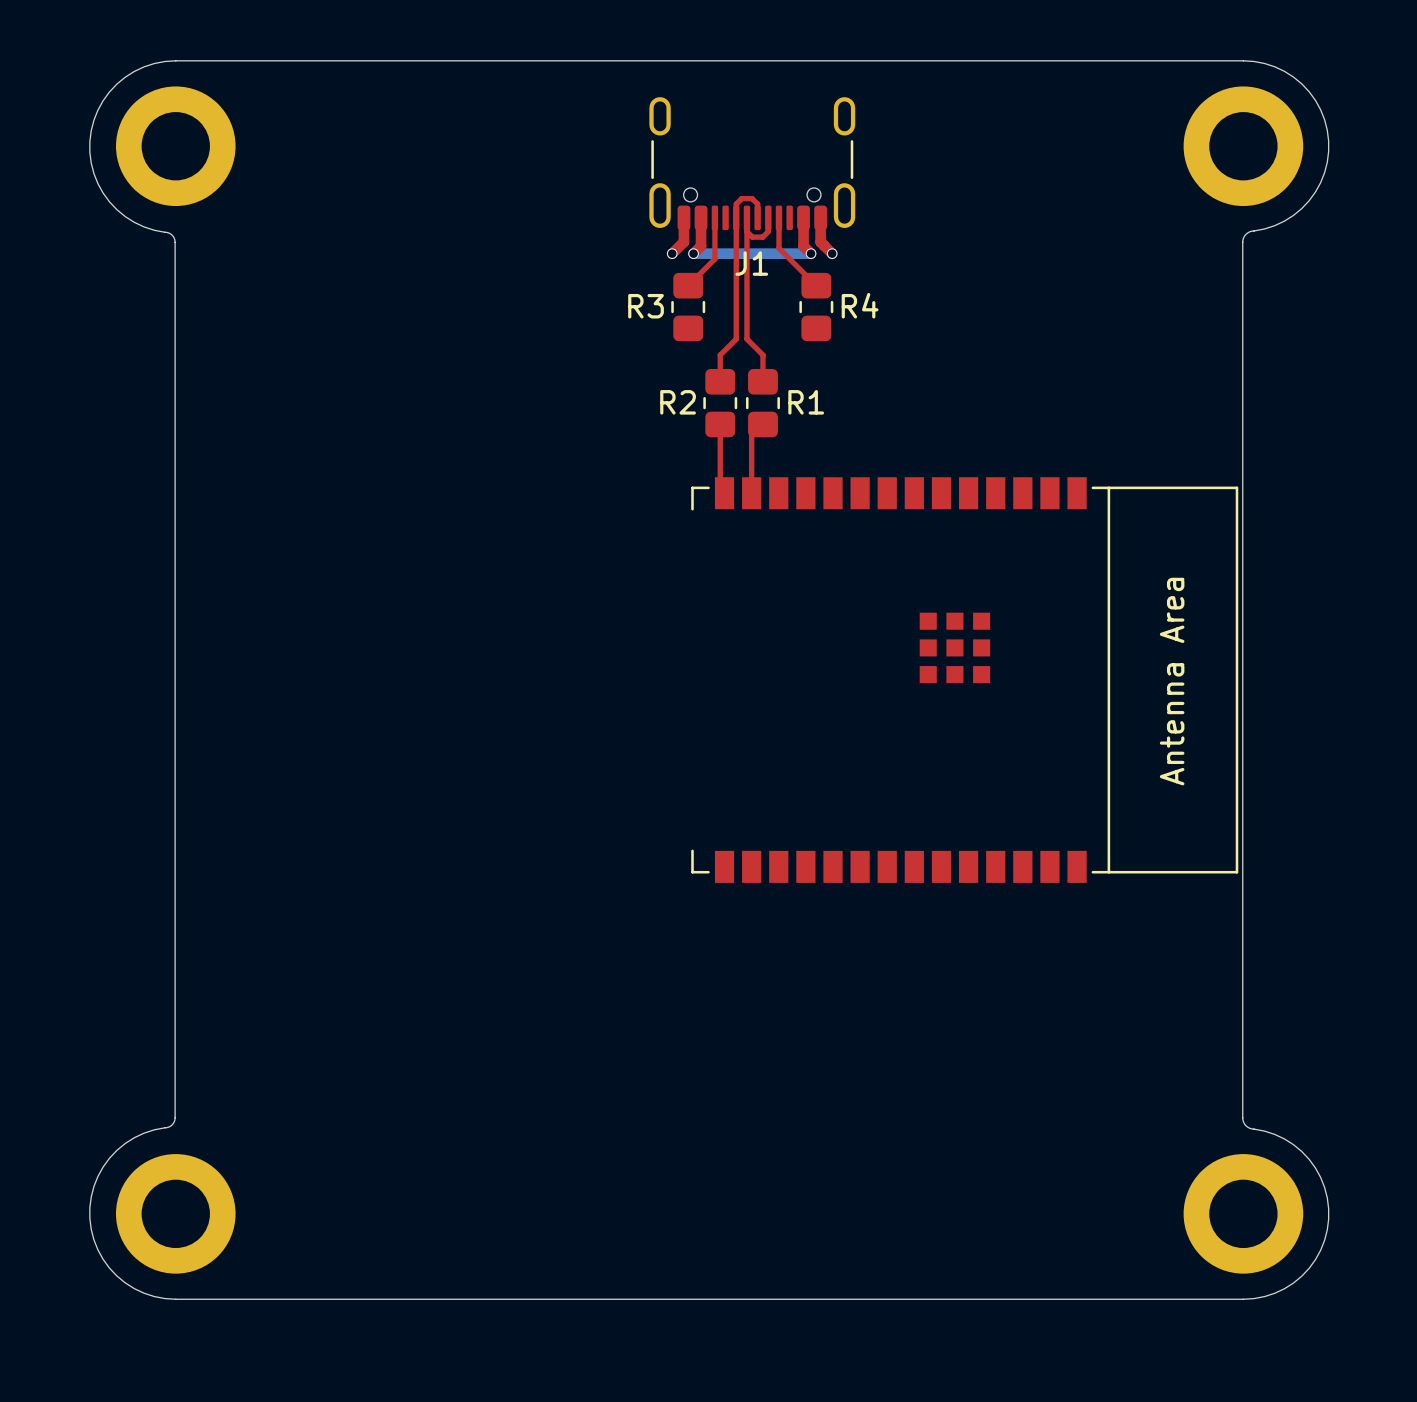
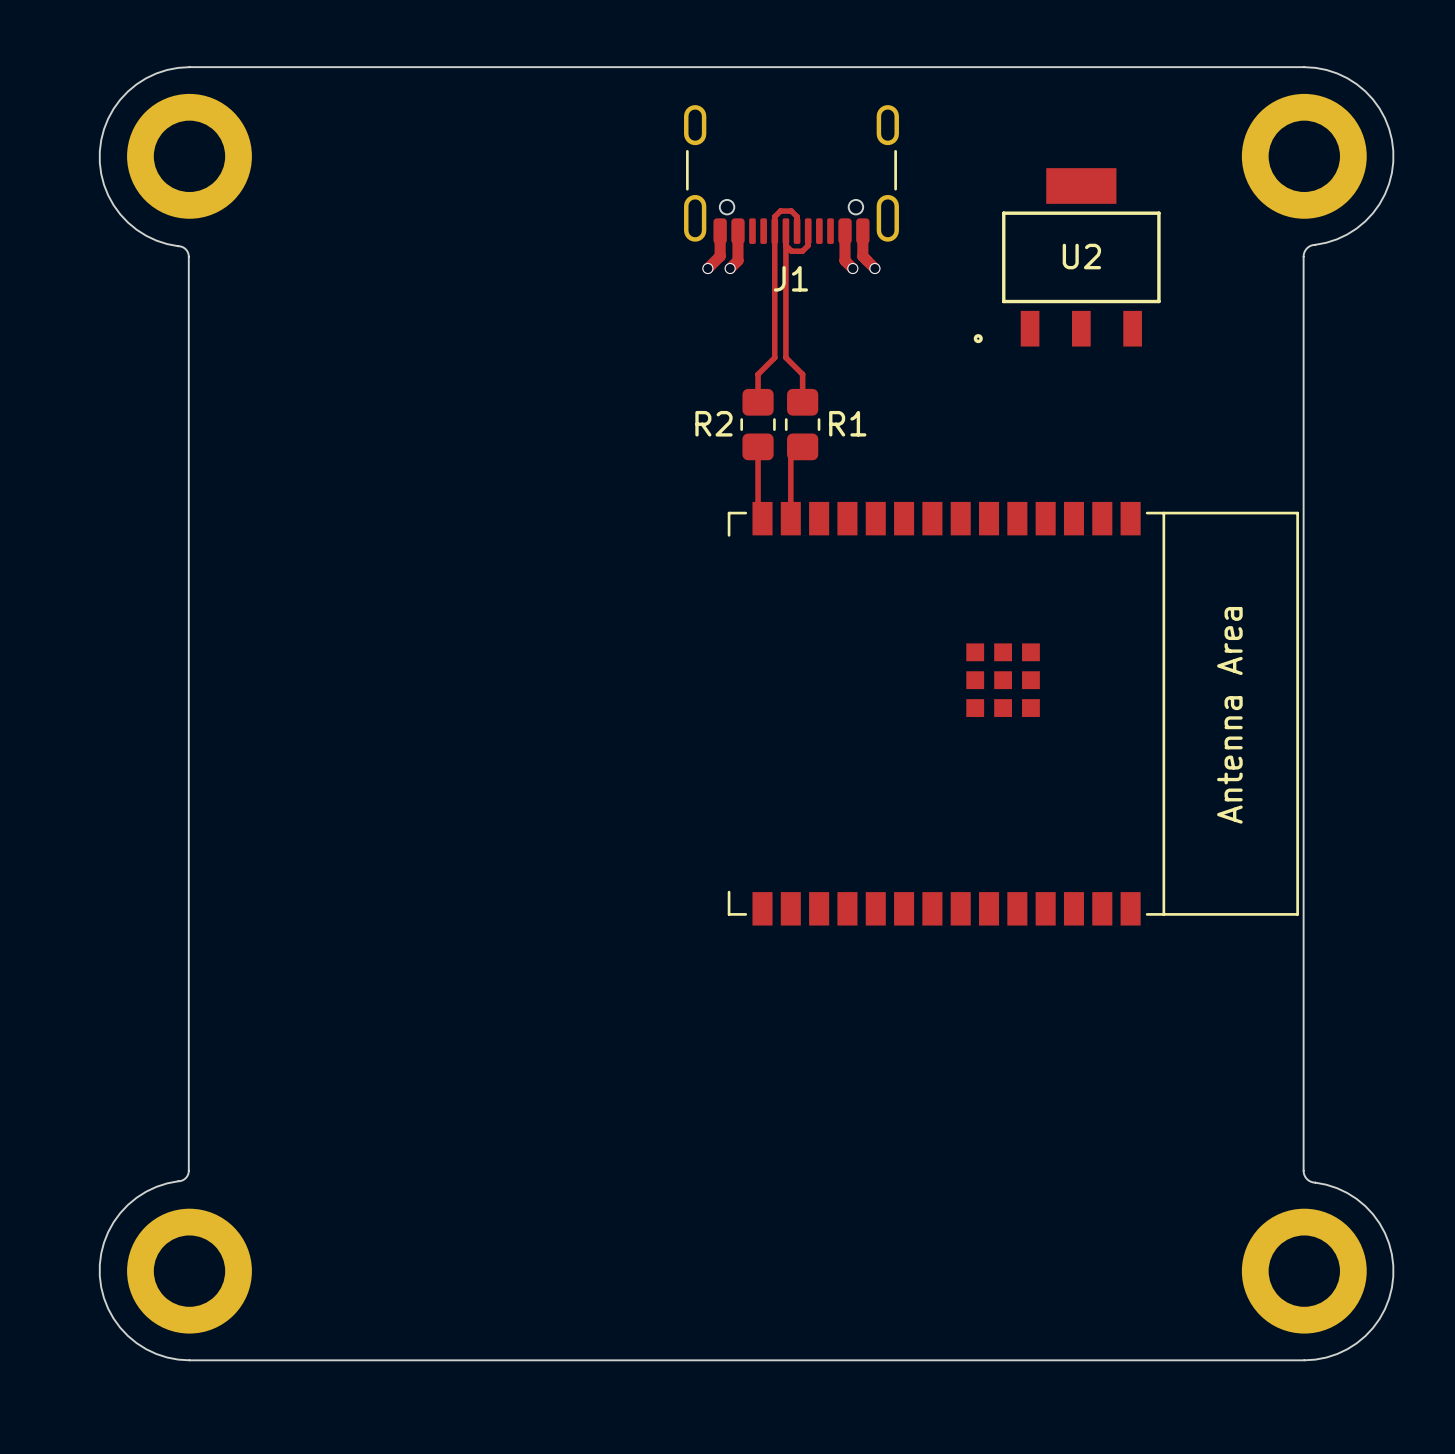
top track: (714, 217) (714, 258) (688, 285) -> none
top track: (778, 217) (778, 248) (816, 285) -> none
U2: none -> (1067, 257)
bottom track: (693, 253) (811, 253) -> none
R3: (688, 307) -> none
R4: (816, 307) -> none

